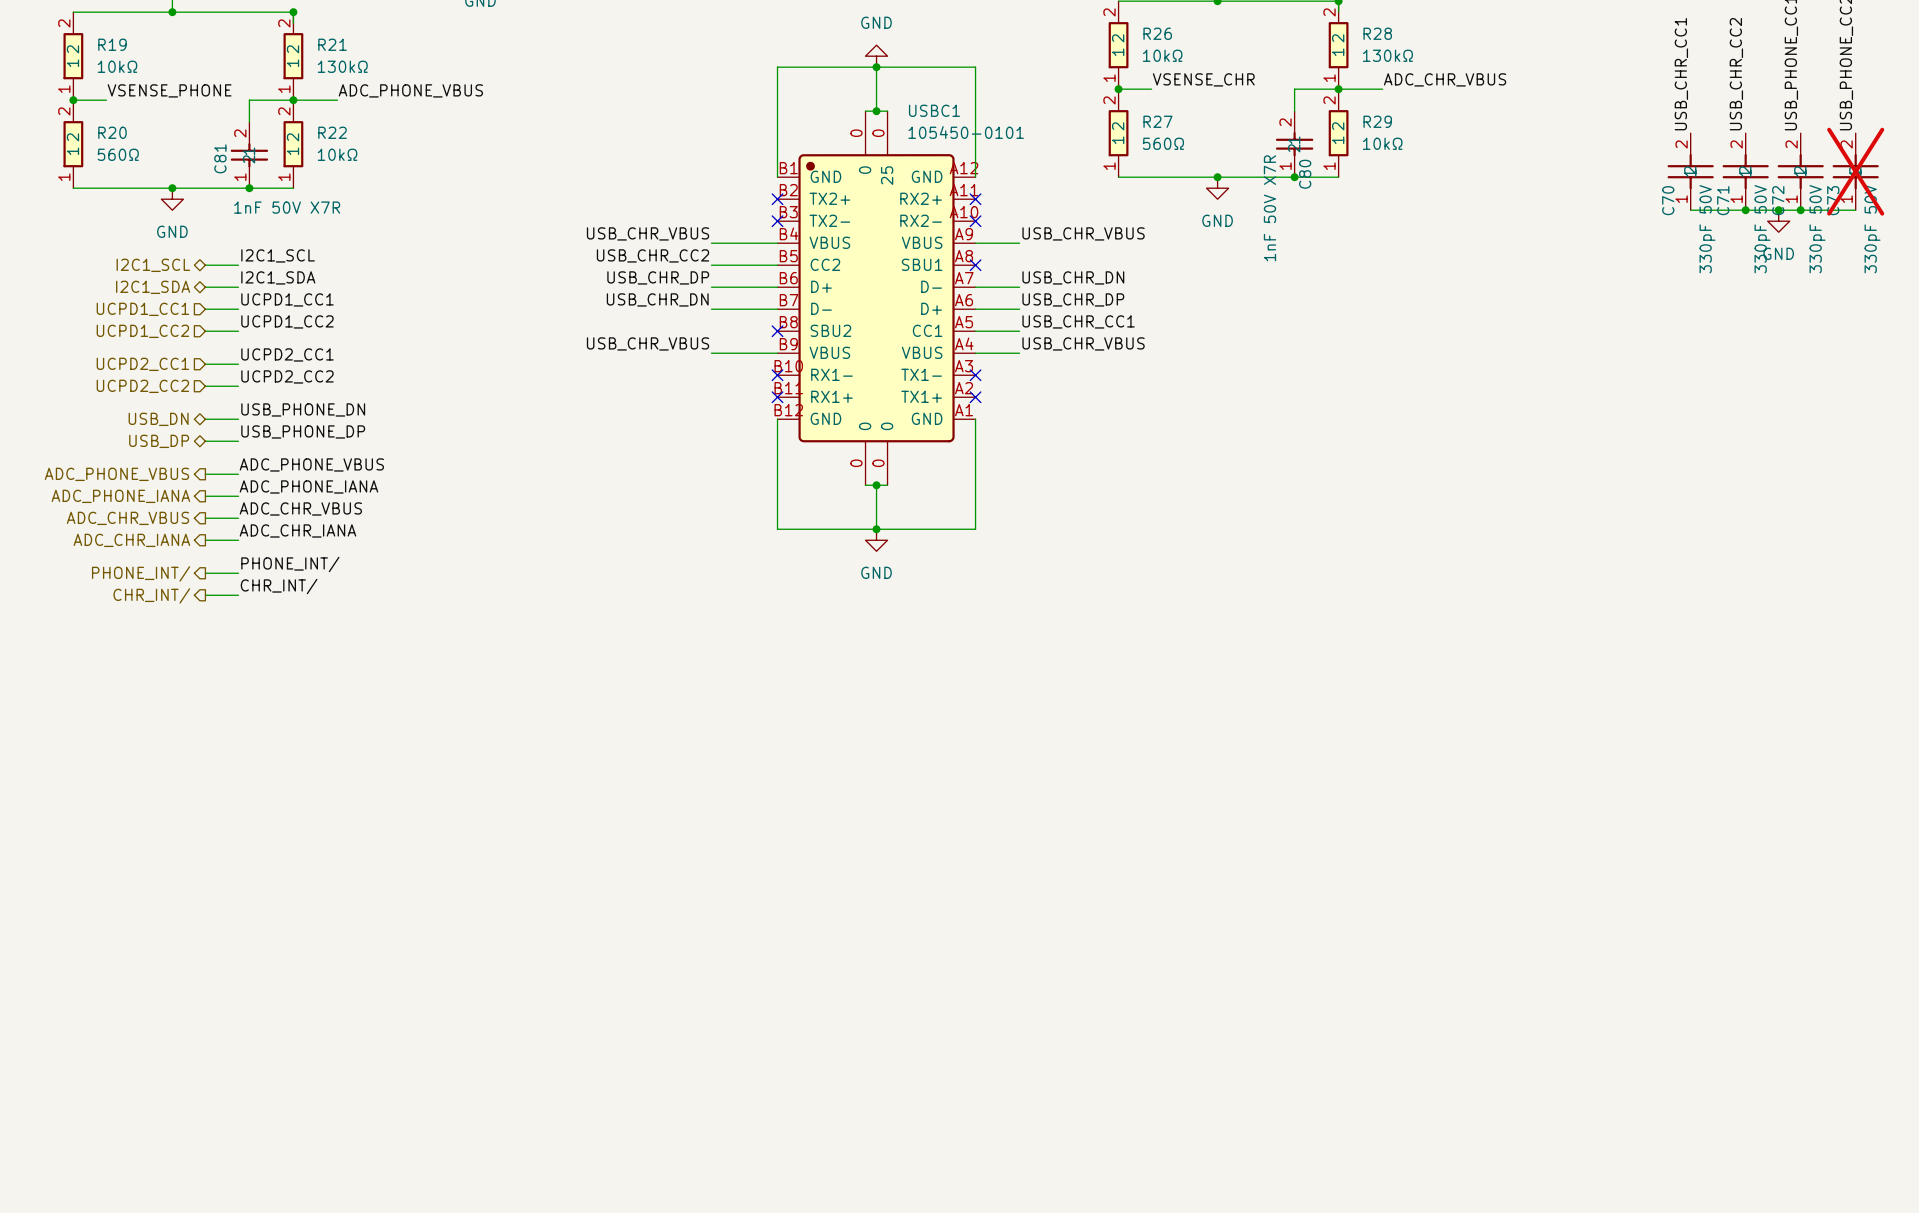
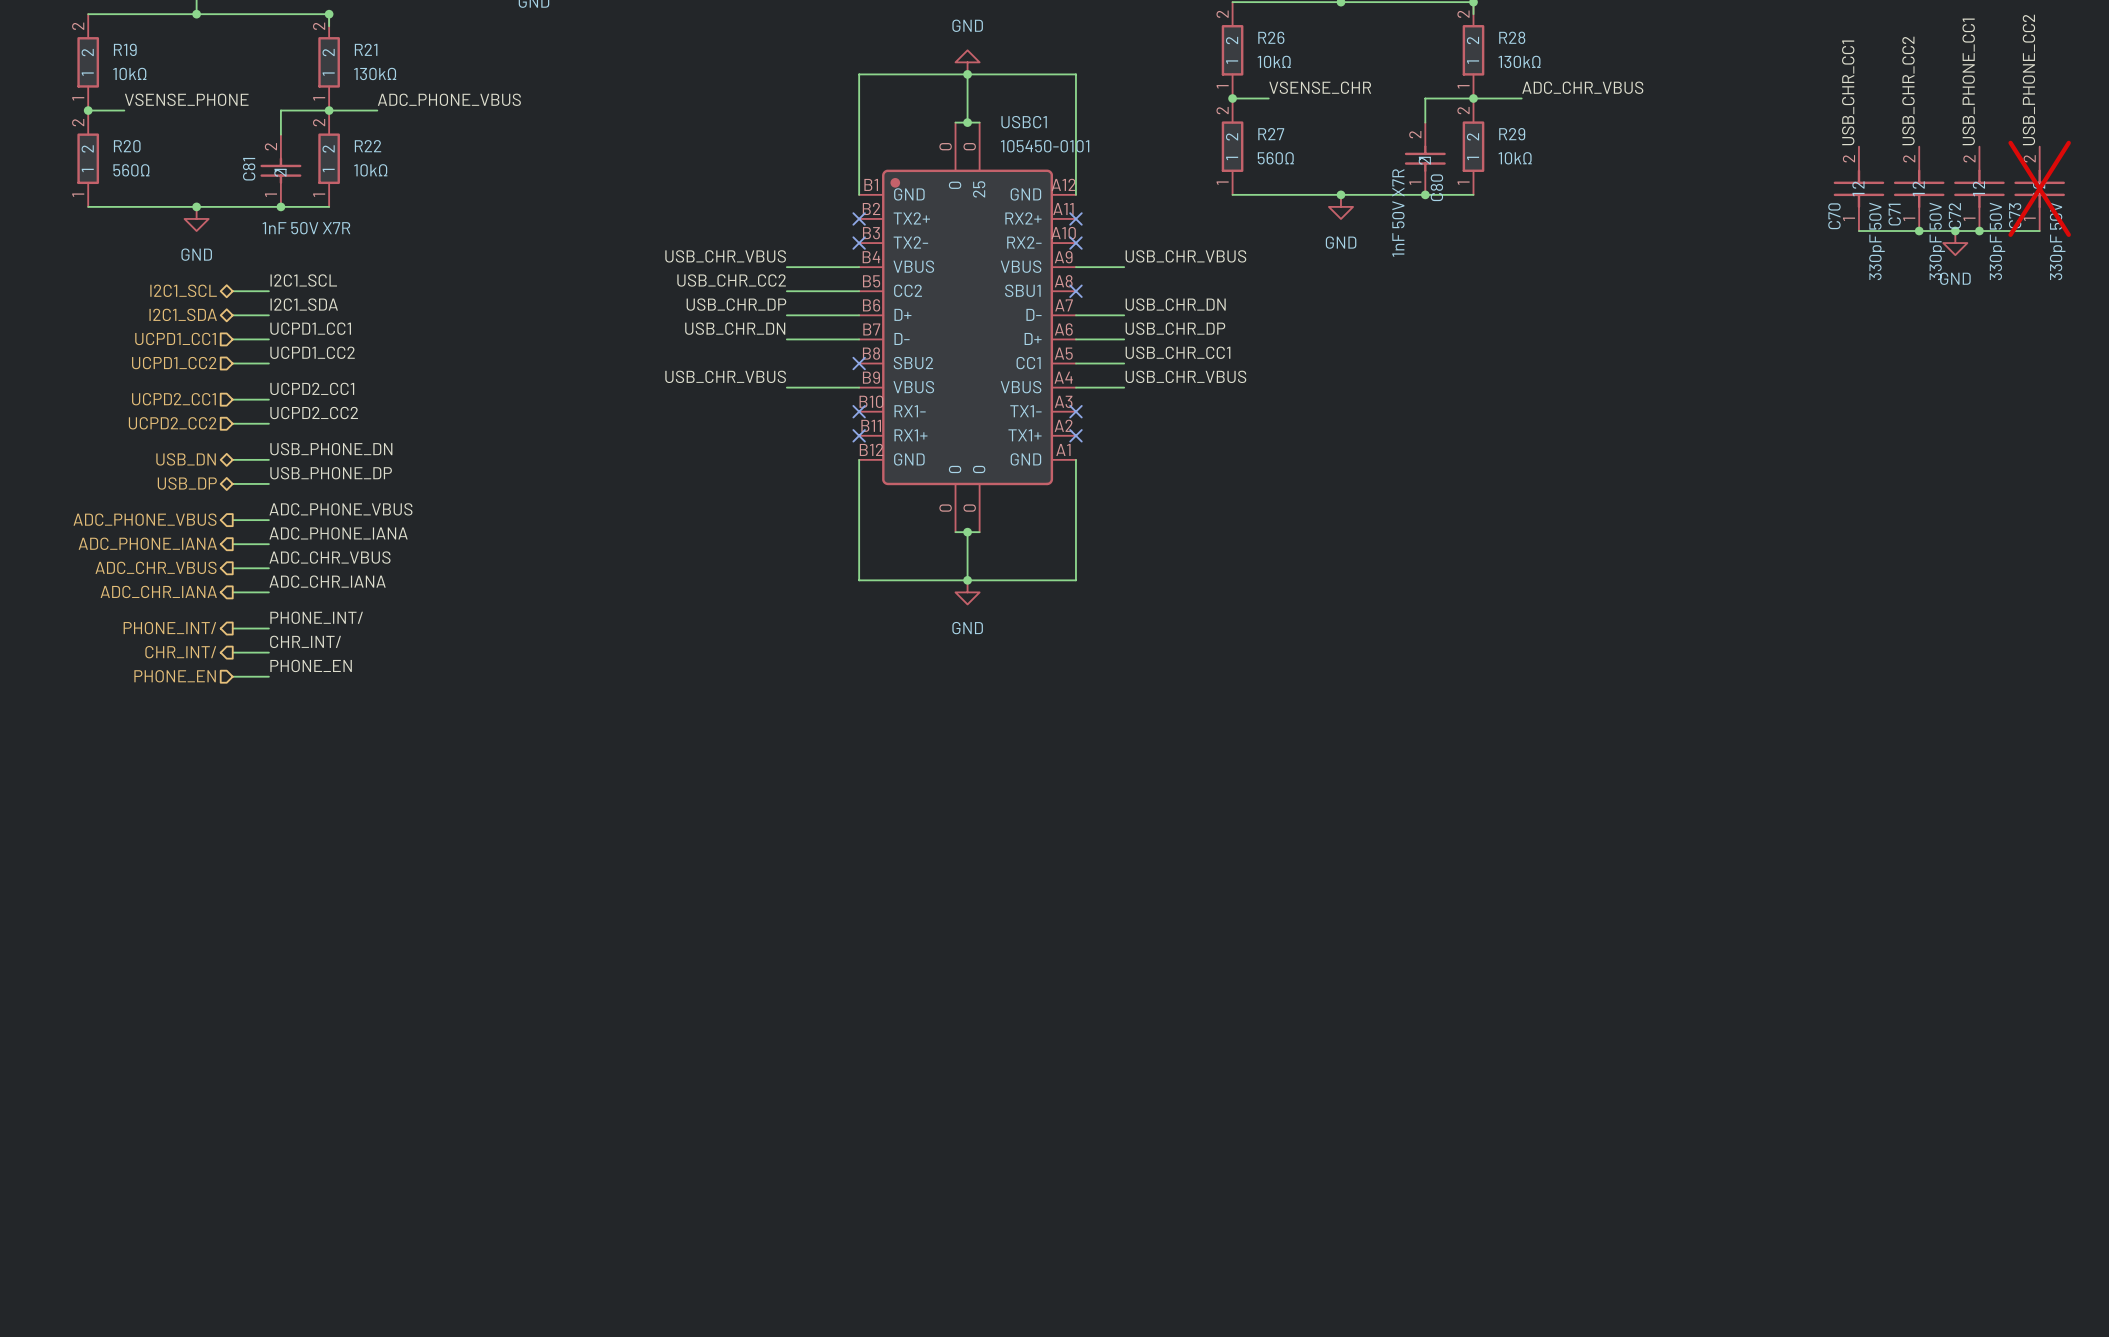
label: none -> PHONE_EN (311, 665)
hierarchical label: none -> PHONE_EN (175, 676)
wire: none -> (232, 676) (268, 676)

